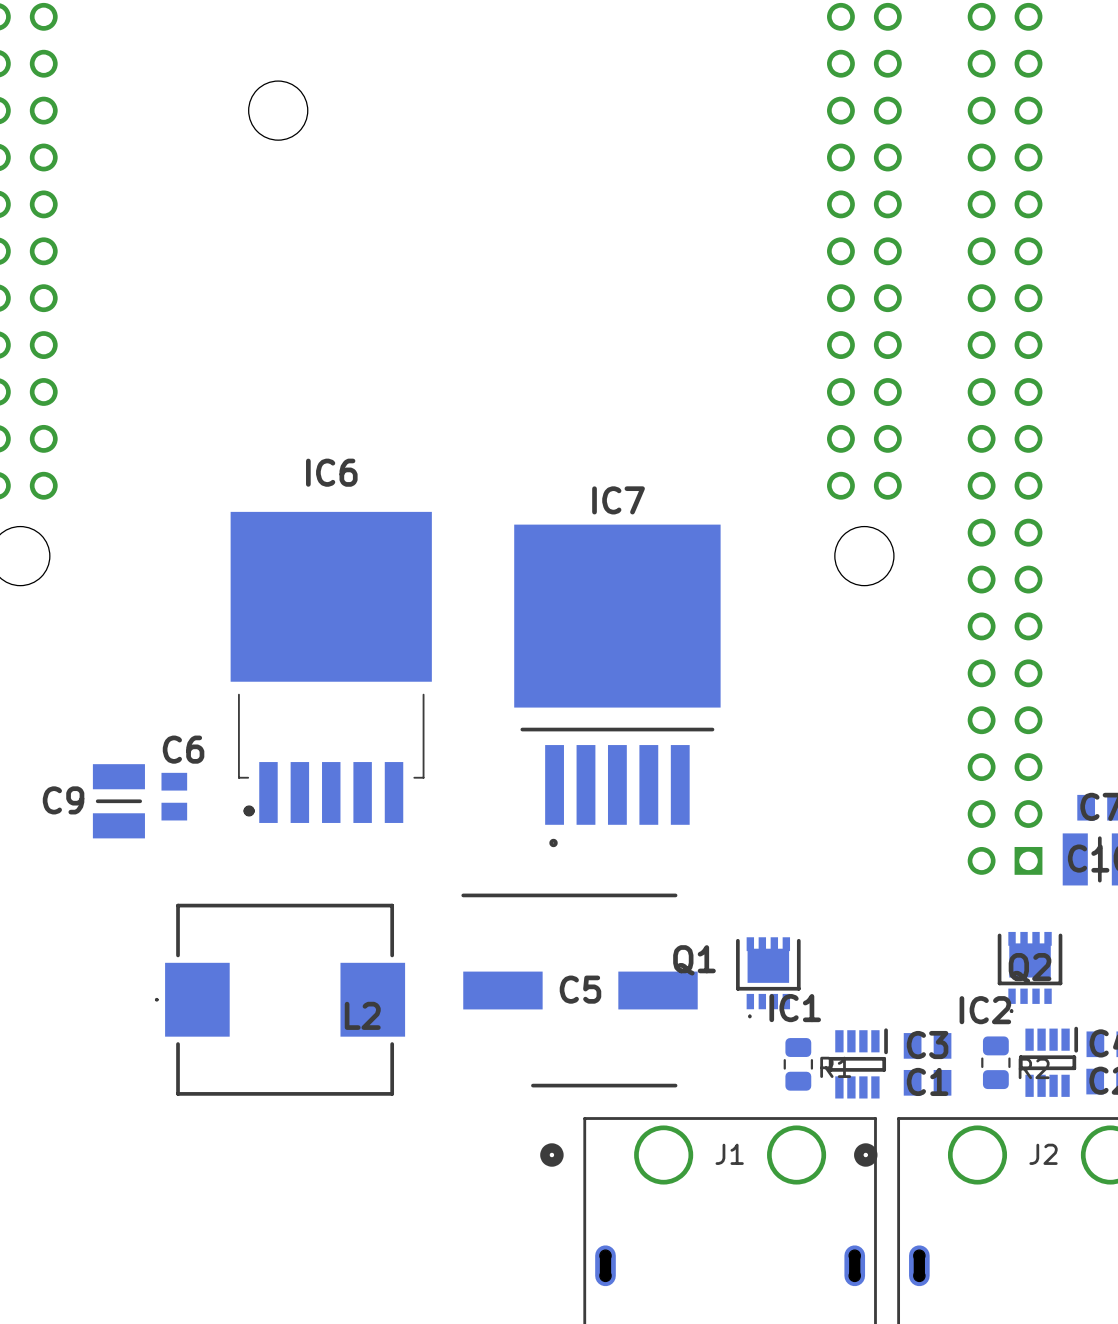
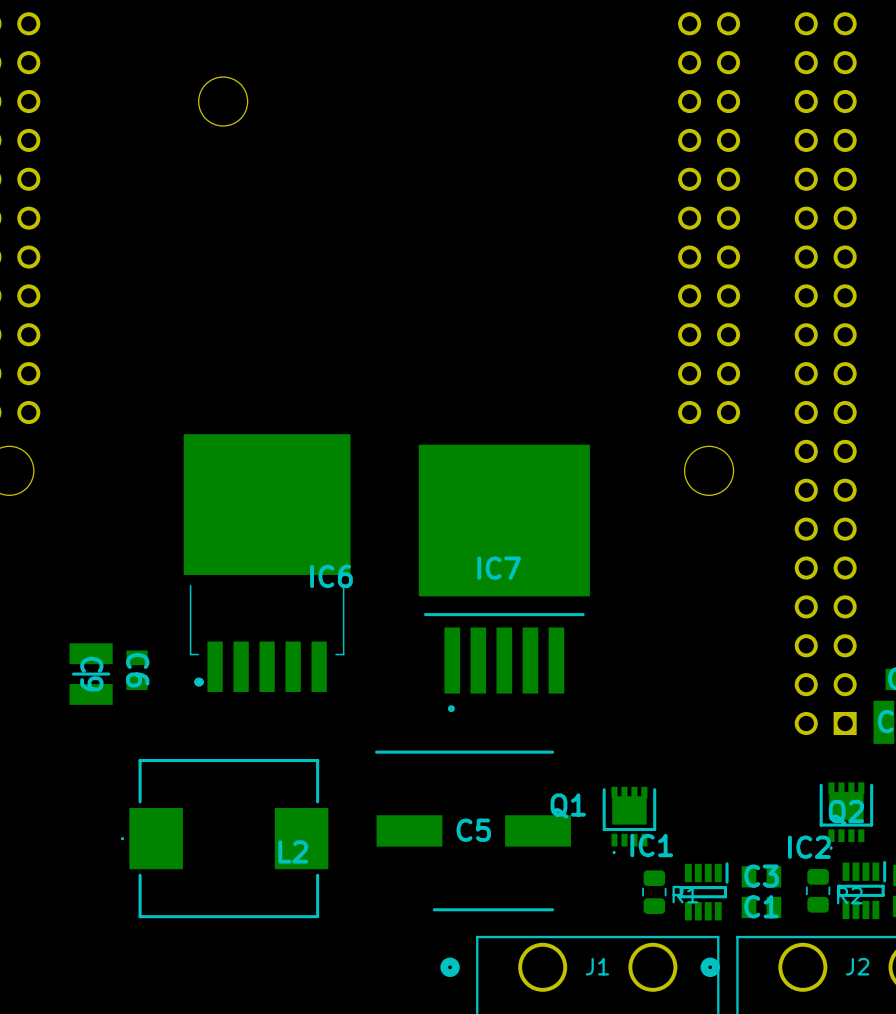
IC6 name position: IC6 (331, 472) -> IC6 (331, 576)
IC7 name position: IC7 (618, 500) -> IC7 (499, 568)
C6 name rotation: 0° (183, 749) -> 90° clockwise (137, 670)
C9 name rotation: 0° (63, 800) -> 90° clockwise (91, 674)

